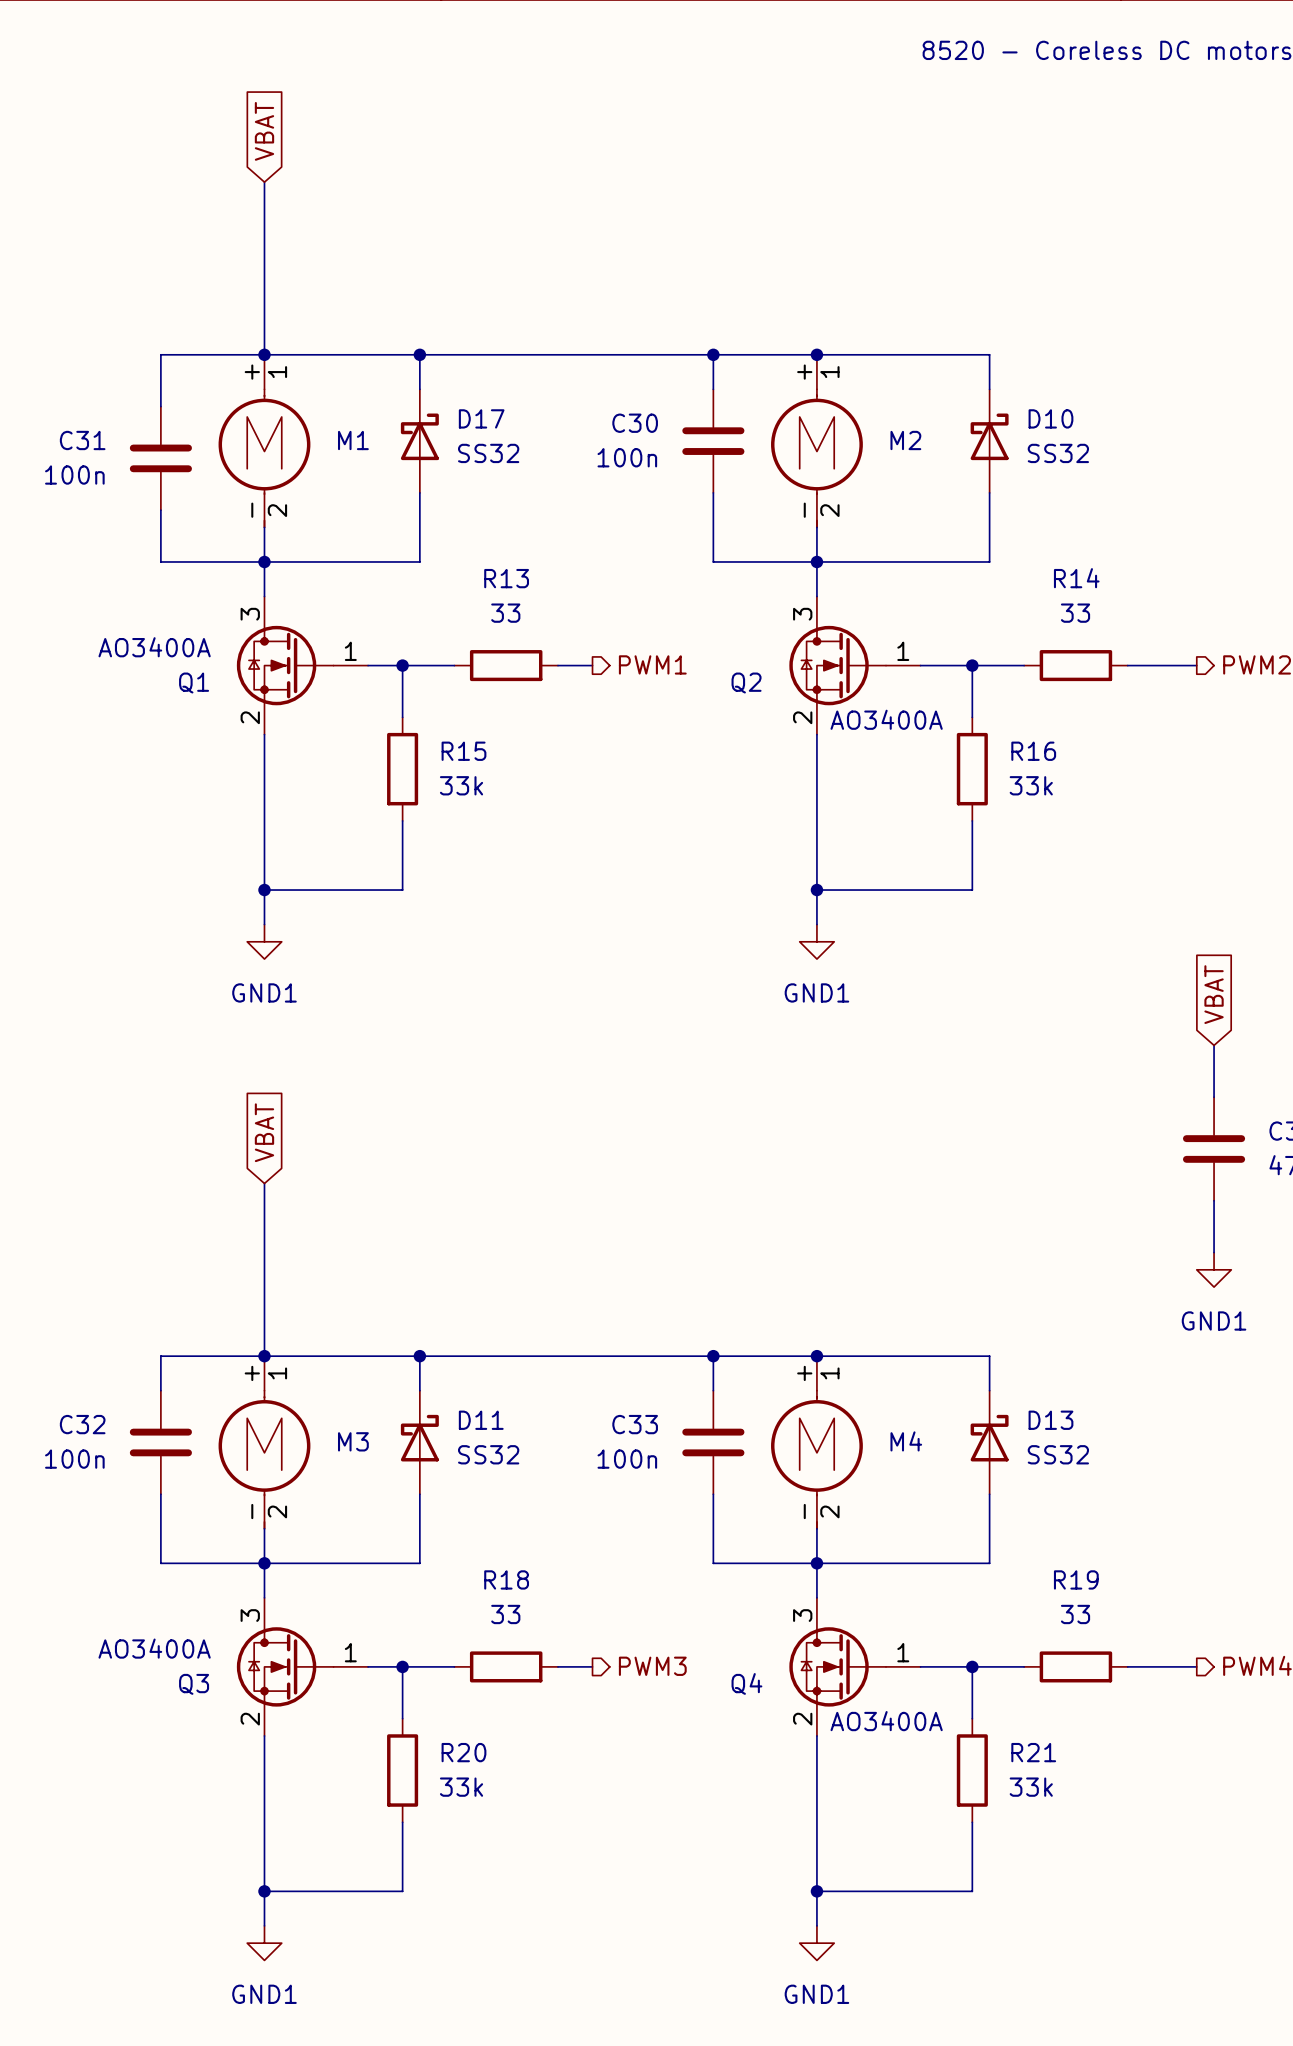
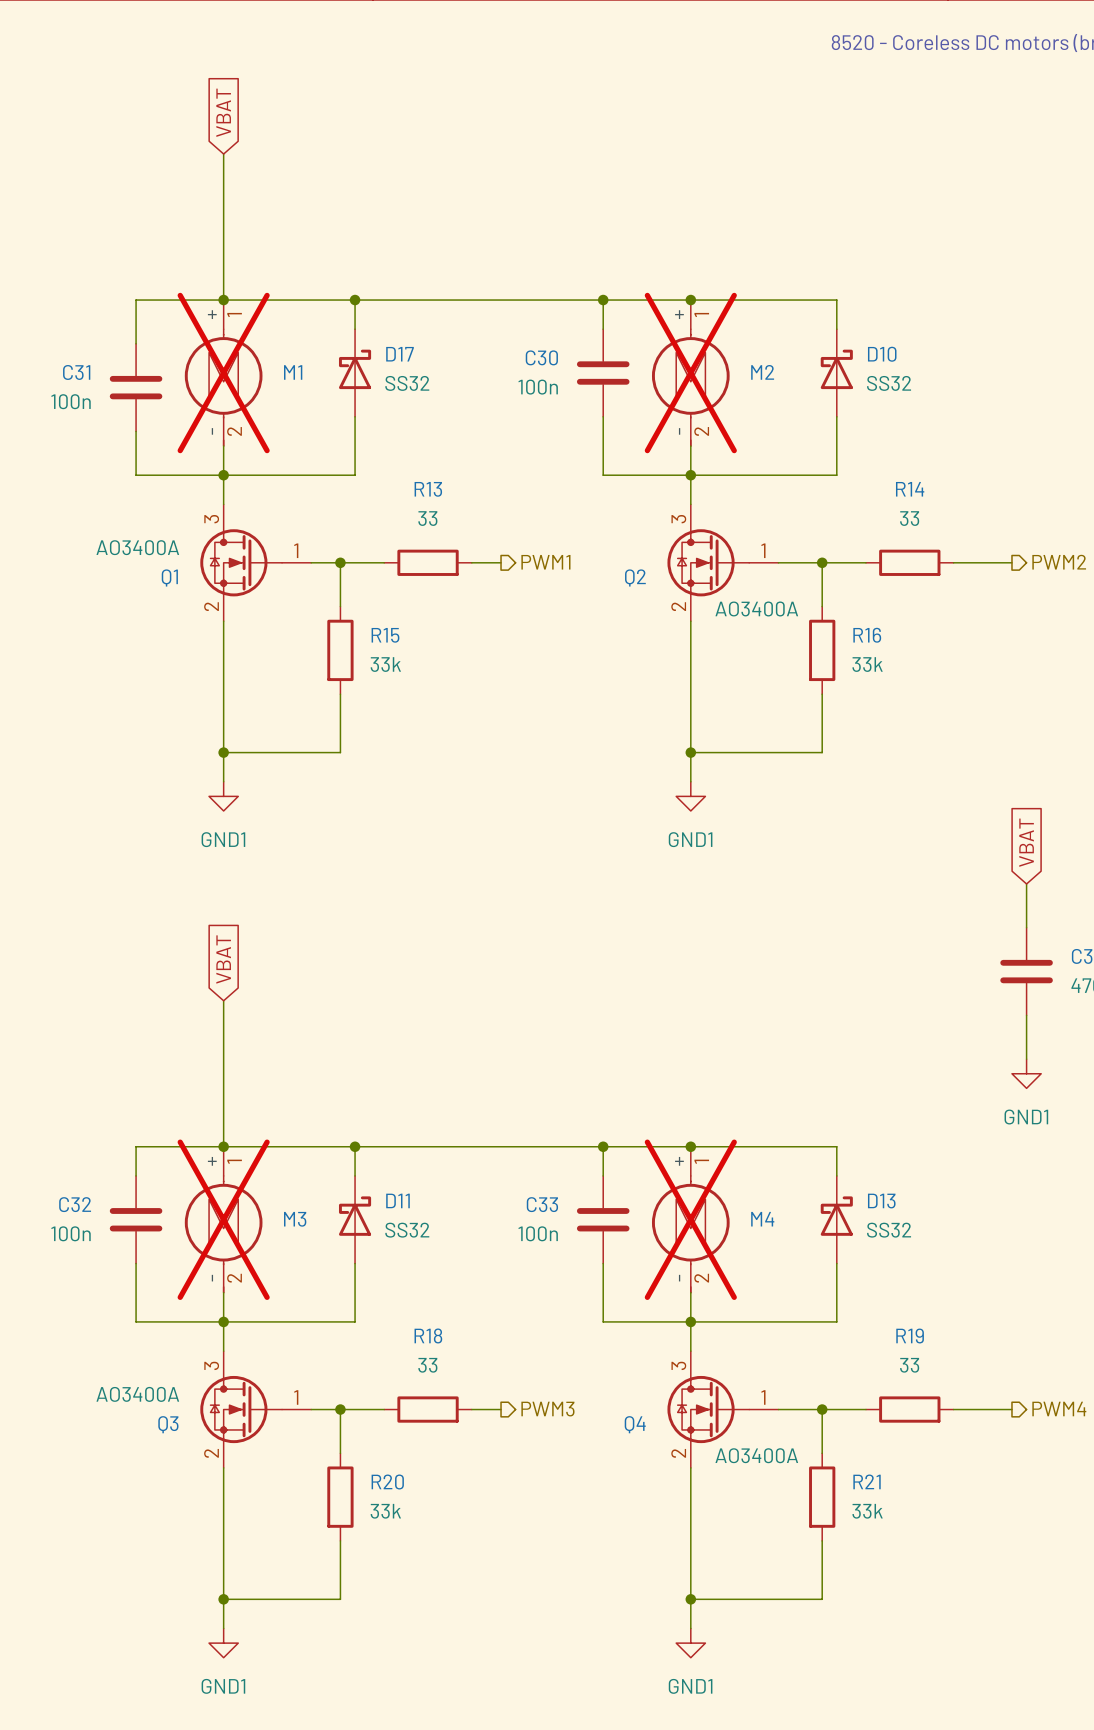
M1 do-not-place cross: none -> (223, 373)
M2 do-not-place cross: none -> (690, 373)
M3 do-not-place cross: none -> (223, 1219)
M4 do-not-place cross: none -> (690, 1219)

